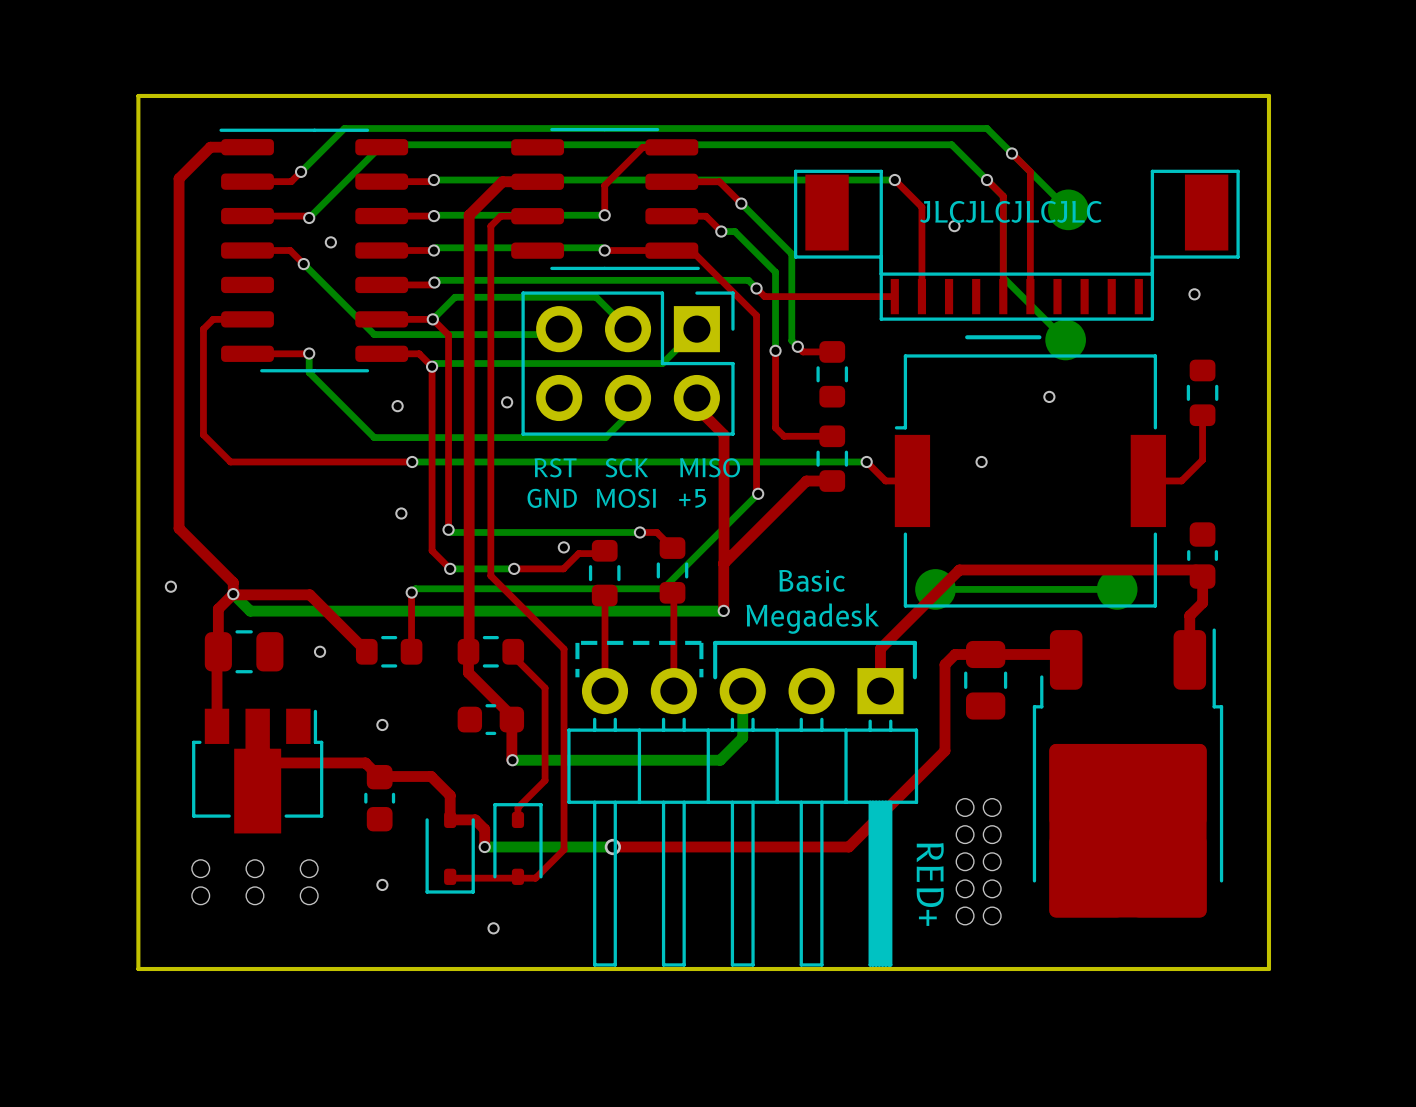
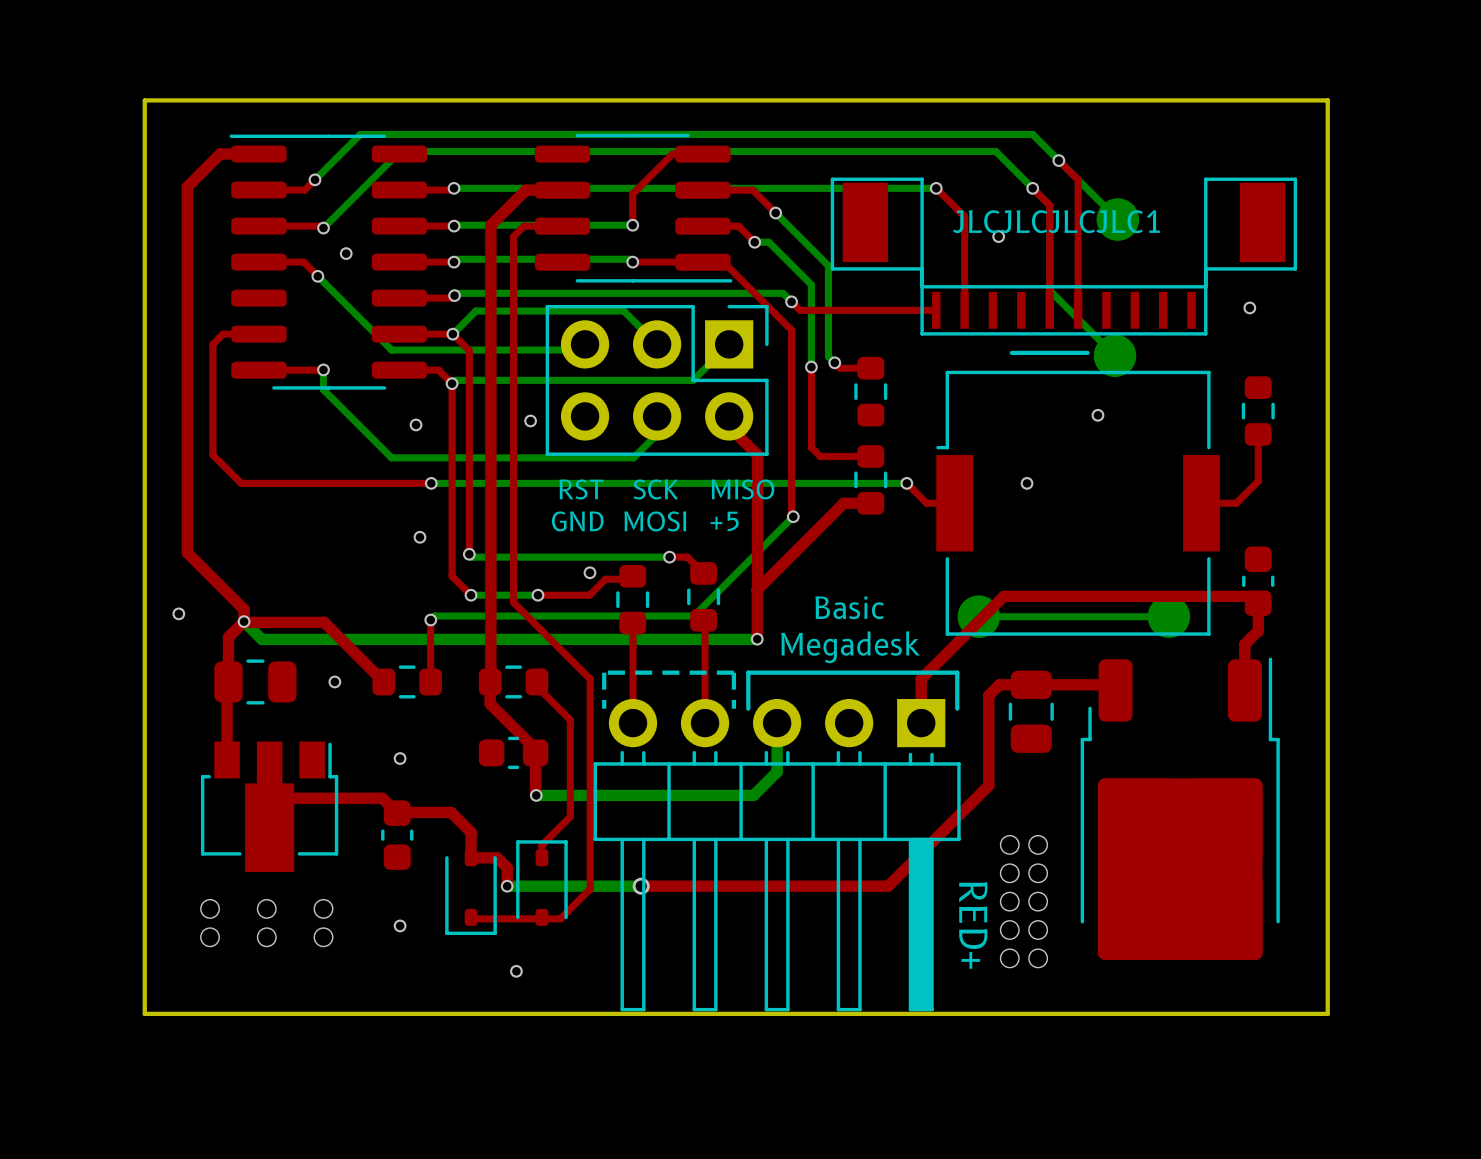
text: JLCJLCJLCJLC (1010, 211) -> JLCJLCJLCJLC1 (1056, 221)

